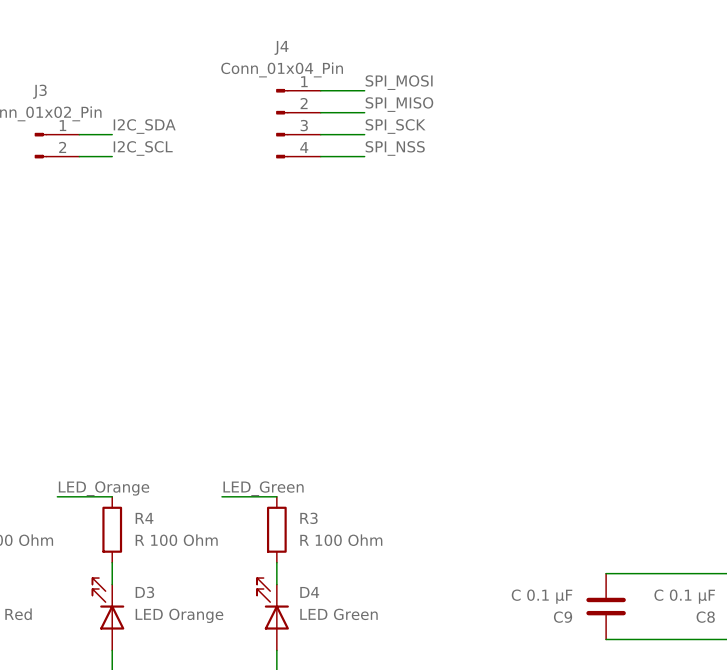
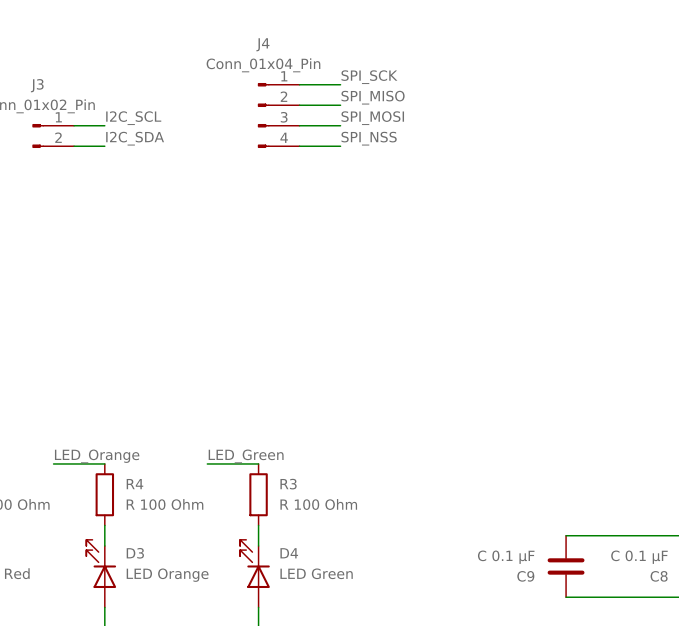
label: SPI_MOSI (399, 82) -> SPI_SCK (369, 77)
label: I2C_SDA (144, 126) -> I2C_SCL (133, 118)
label: SPI_SCK (395, 126) -> SPI_MOSI (372, 118)
label: I2C_SCL (143, 148) -> I2C_SDA (135, 138)

